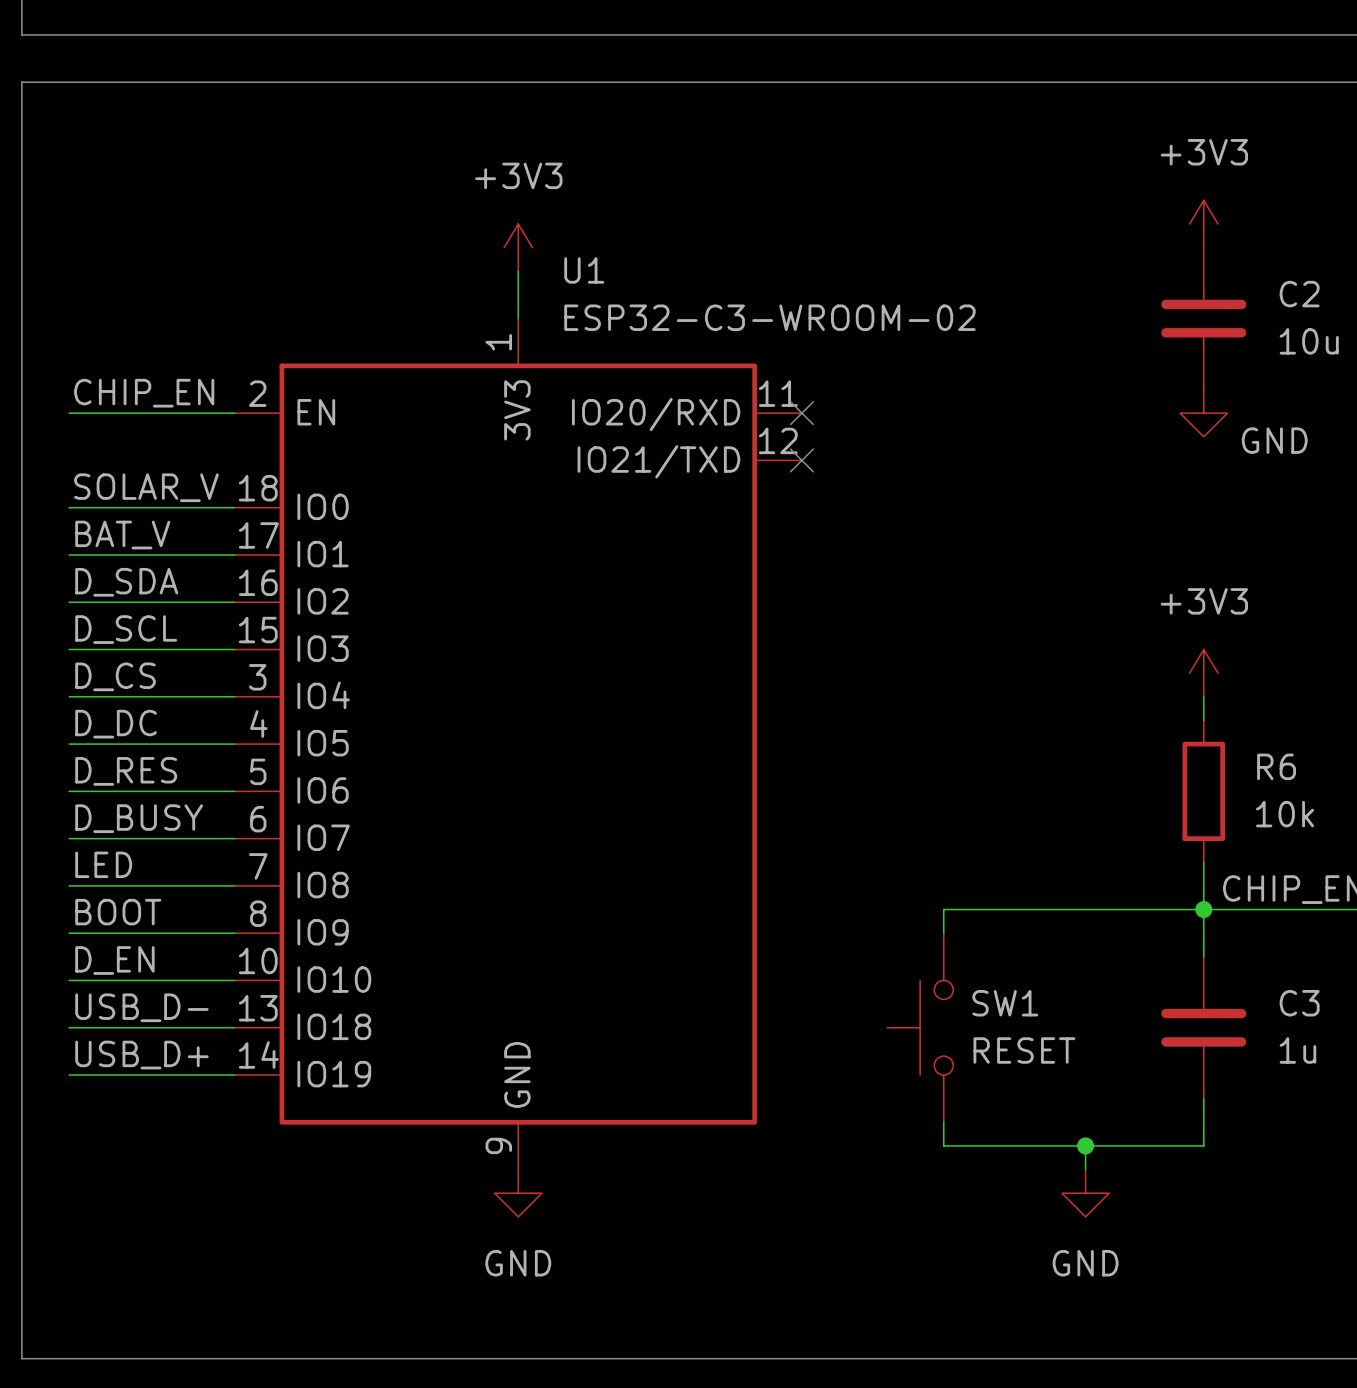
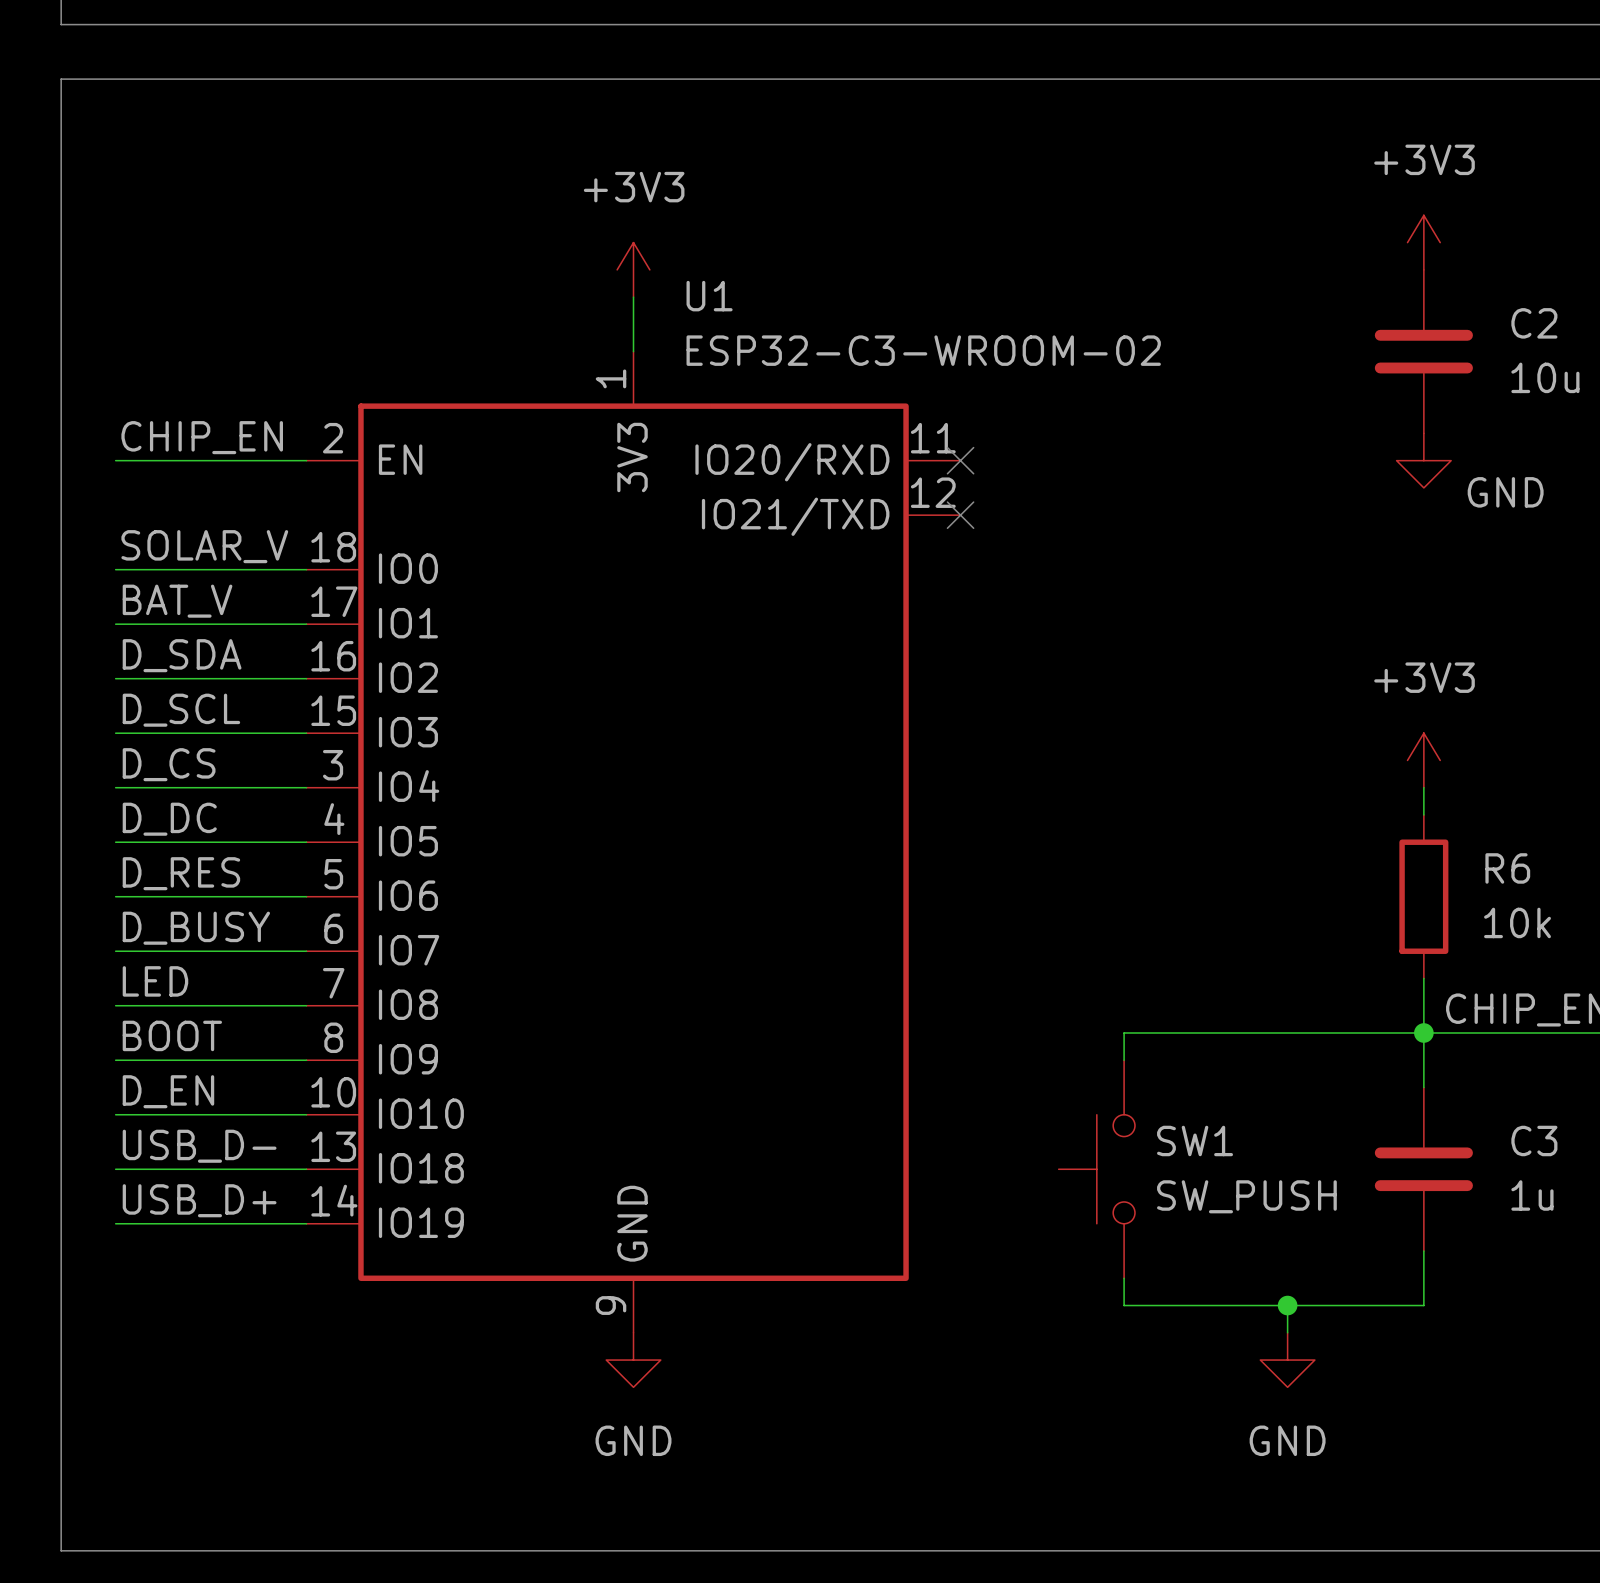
SW1 value: RESET (1024, 1050) -> SW_PUSH (1246, 1196)

